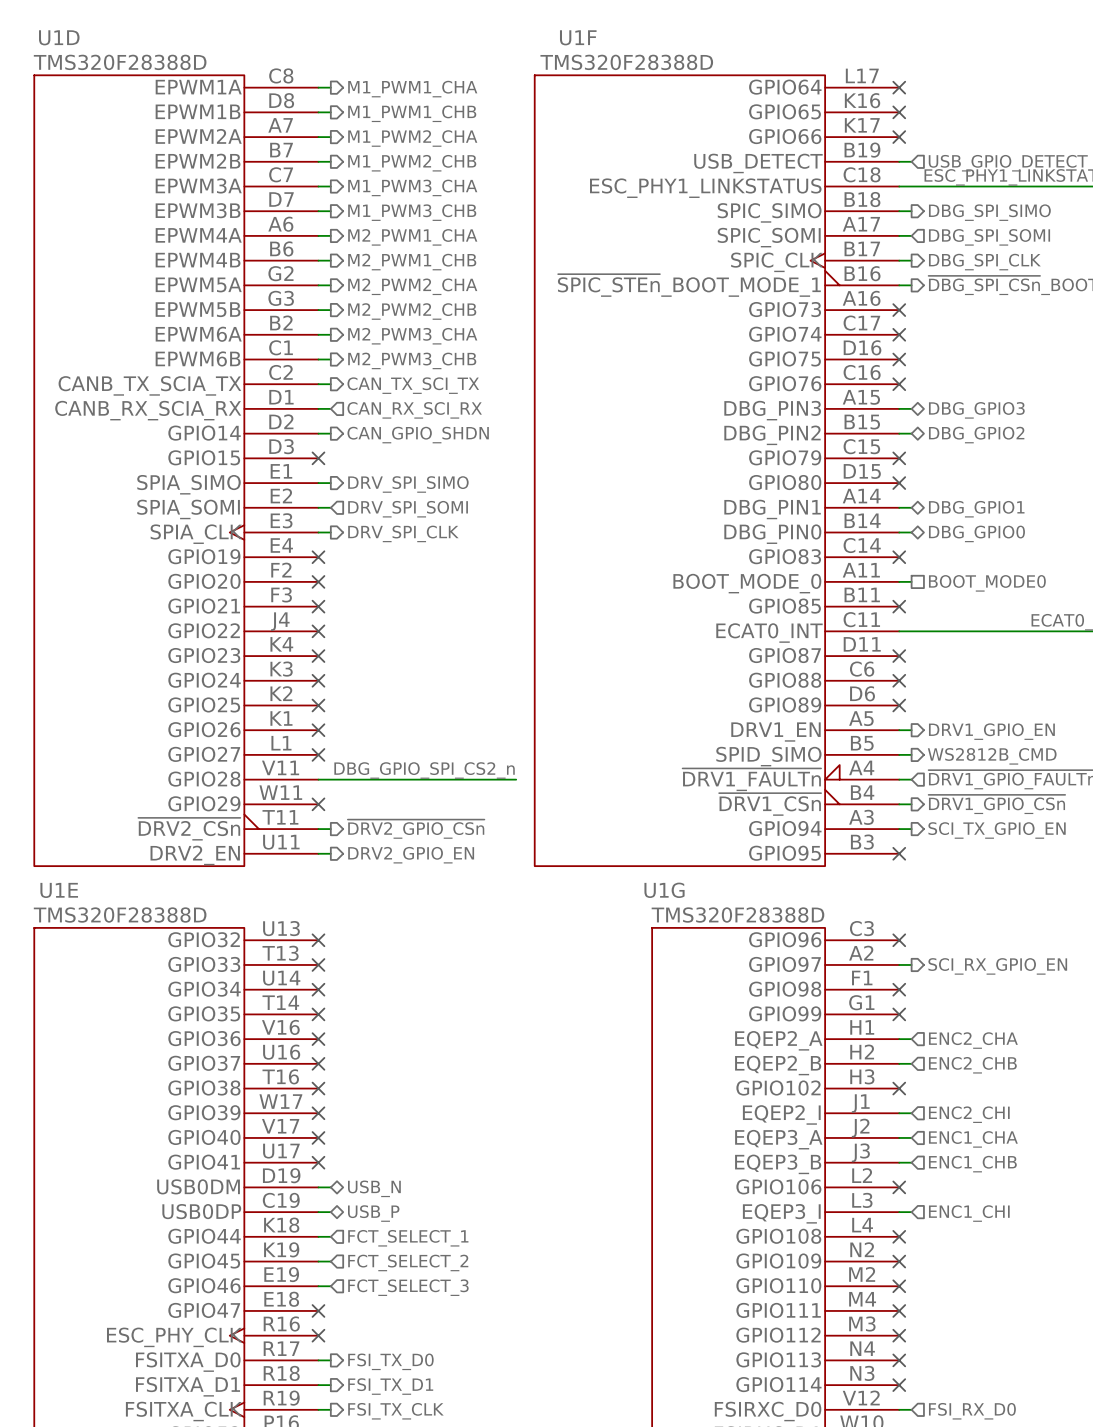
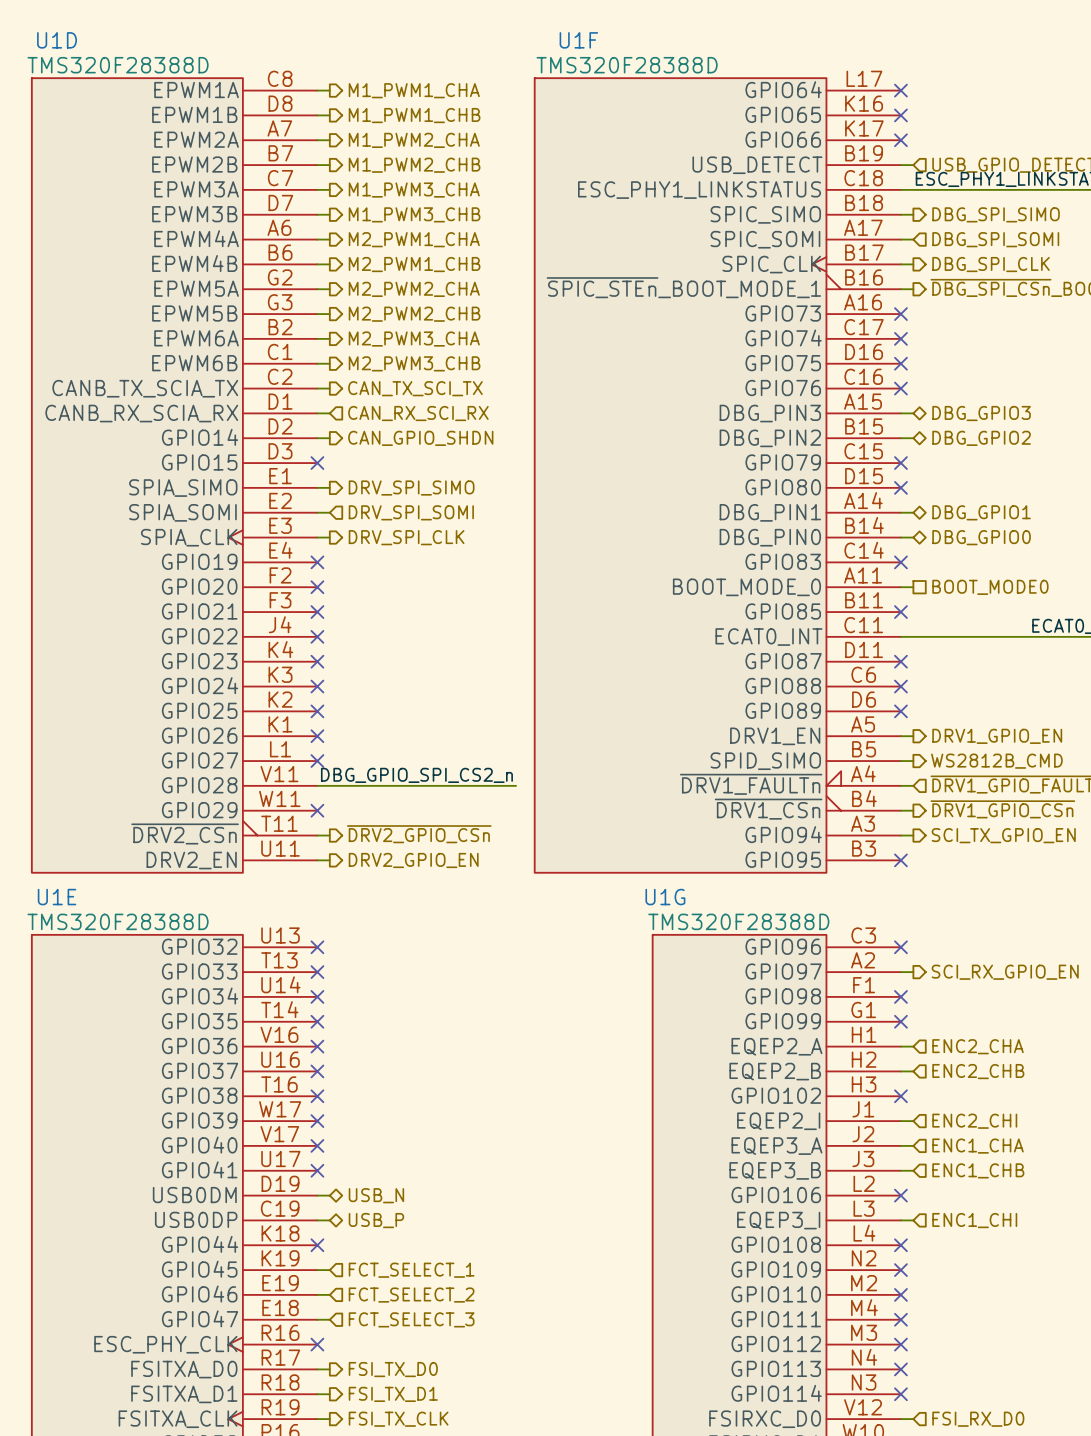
wire: (318, 1236) (330, 1236) -> (317, 1319) (329, 1319)
no-connect mark: none -> (317, 1245)
hierarchical label: FCT_SELECT_1 (408, 1238) -> none
hierarchical label: FCT_SELECT_2 (408, 1262) -> FCT_SELECT_1 (411, 1270)
hierarchical label: FCT_SELECT_3 (408, 1287) -> FCT_SELECT_2 (411, 1295)
no-connect mark: (318, 1310) -> none
hierarchical label: none -> FCT_SELECT_3 (411, 1319)

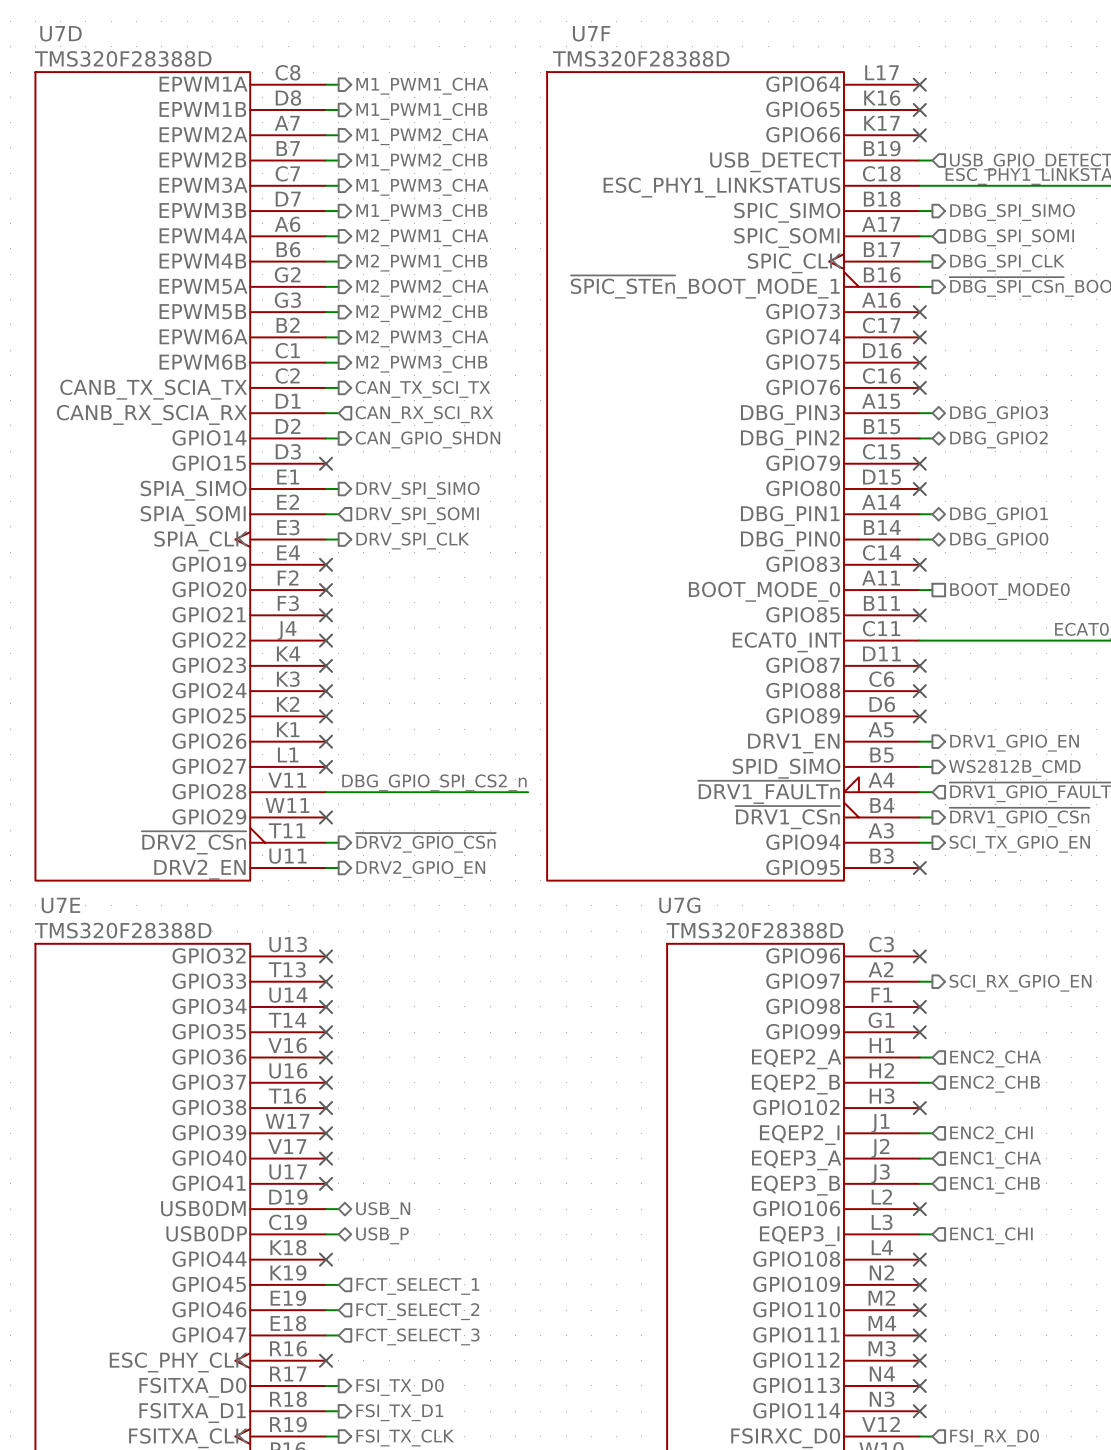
U1D name: U1D (57, 40) -> U7D (60, 33)
U1F name: U1F (578, 40) -> U7F (591, 33)
U1E name: U1E (57, 897) -> U7E (60, 905)
U1G name: U1G (665, 897) -> U7G (679, 905)

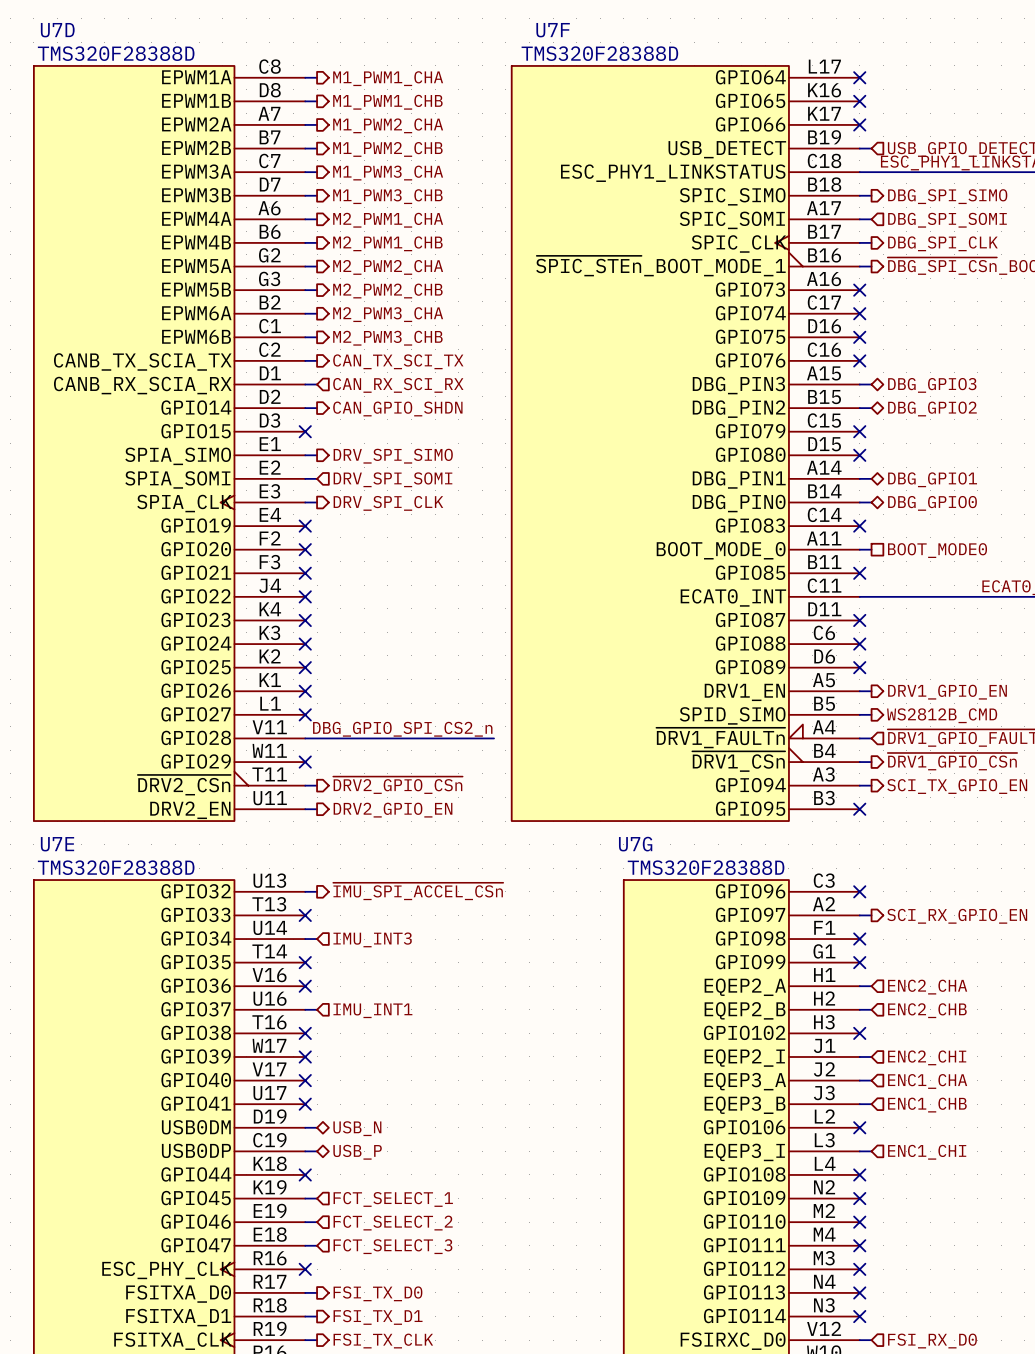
wire: none -> (305, 891) (317, 891)
no-connect mark: (326, 956) -> none
hierarchical label: none -> ~{IMU_SPI_ACCEL_CSn} (418, 891)
wire: none -> (305, 939) (317, 939)
no-connect mark: (326, 1006) -> none
hierarchical label: none -> IMU_INT3 (372, 939)
wire: none -> (305, 1009) (317, 1009)
no-connect mark: (326, 1082) -> none
hierarchical label: none -> IMU_INT1 (372, 1010)

